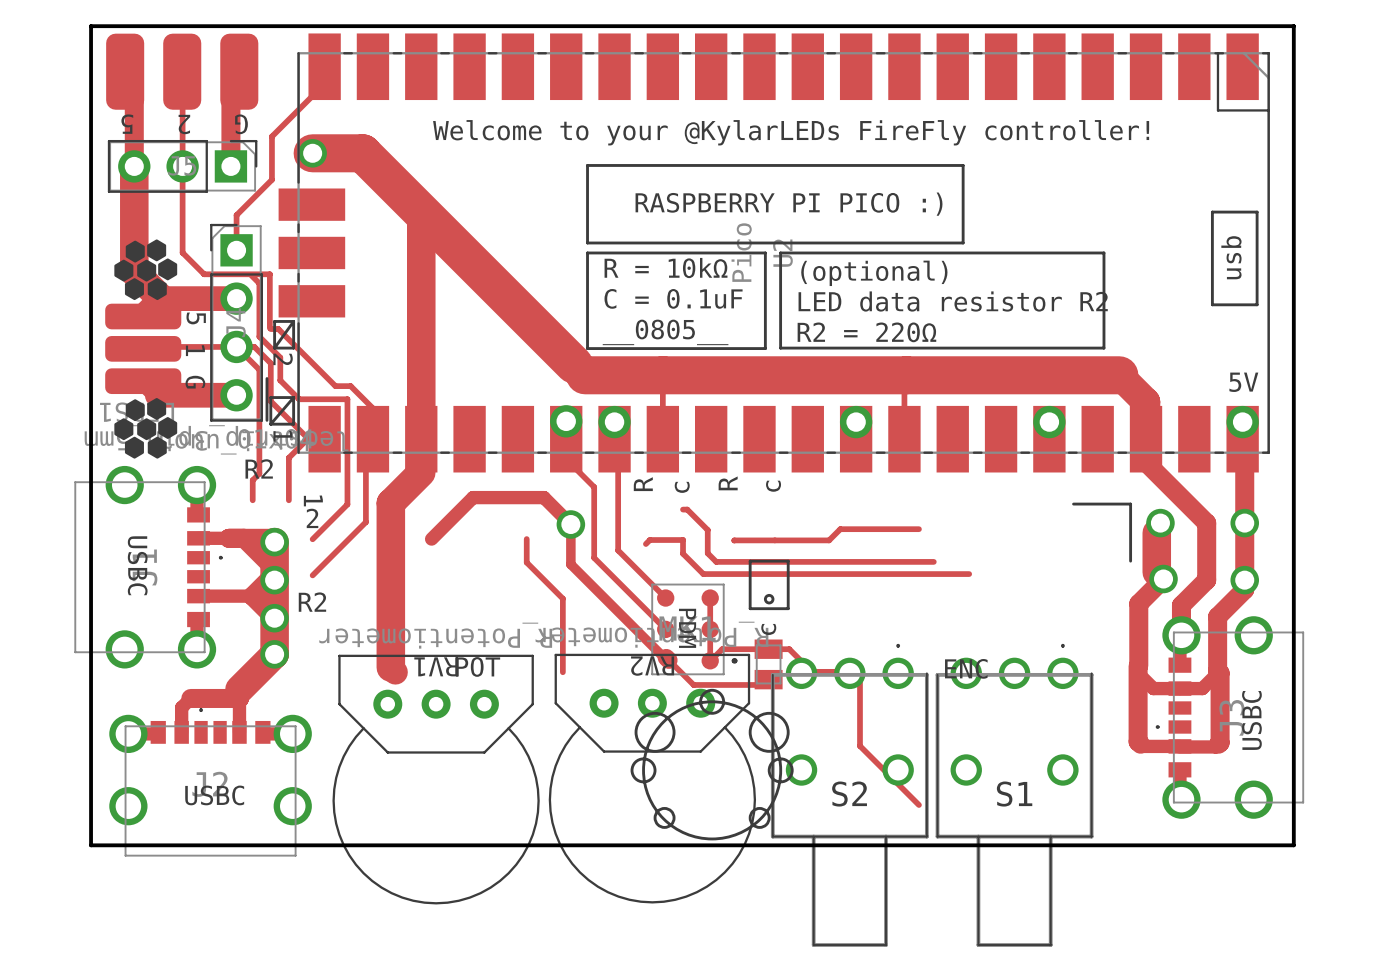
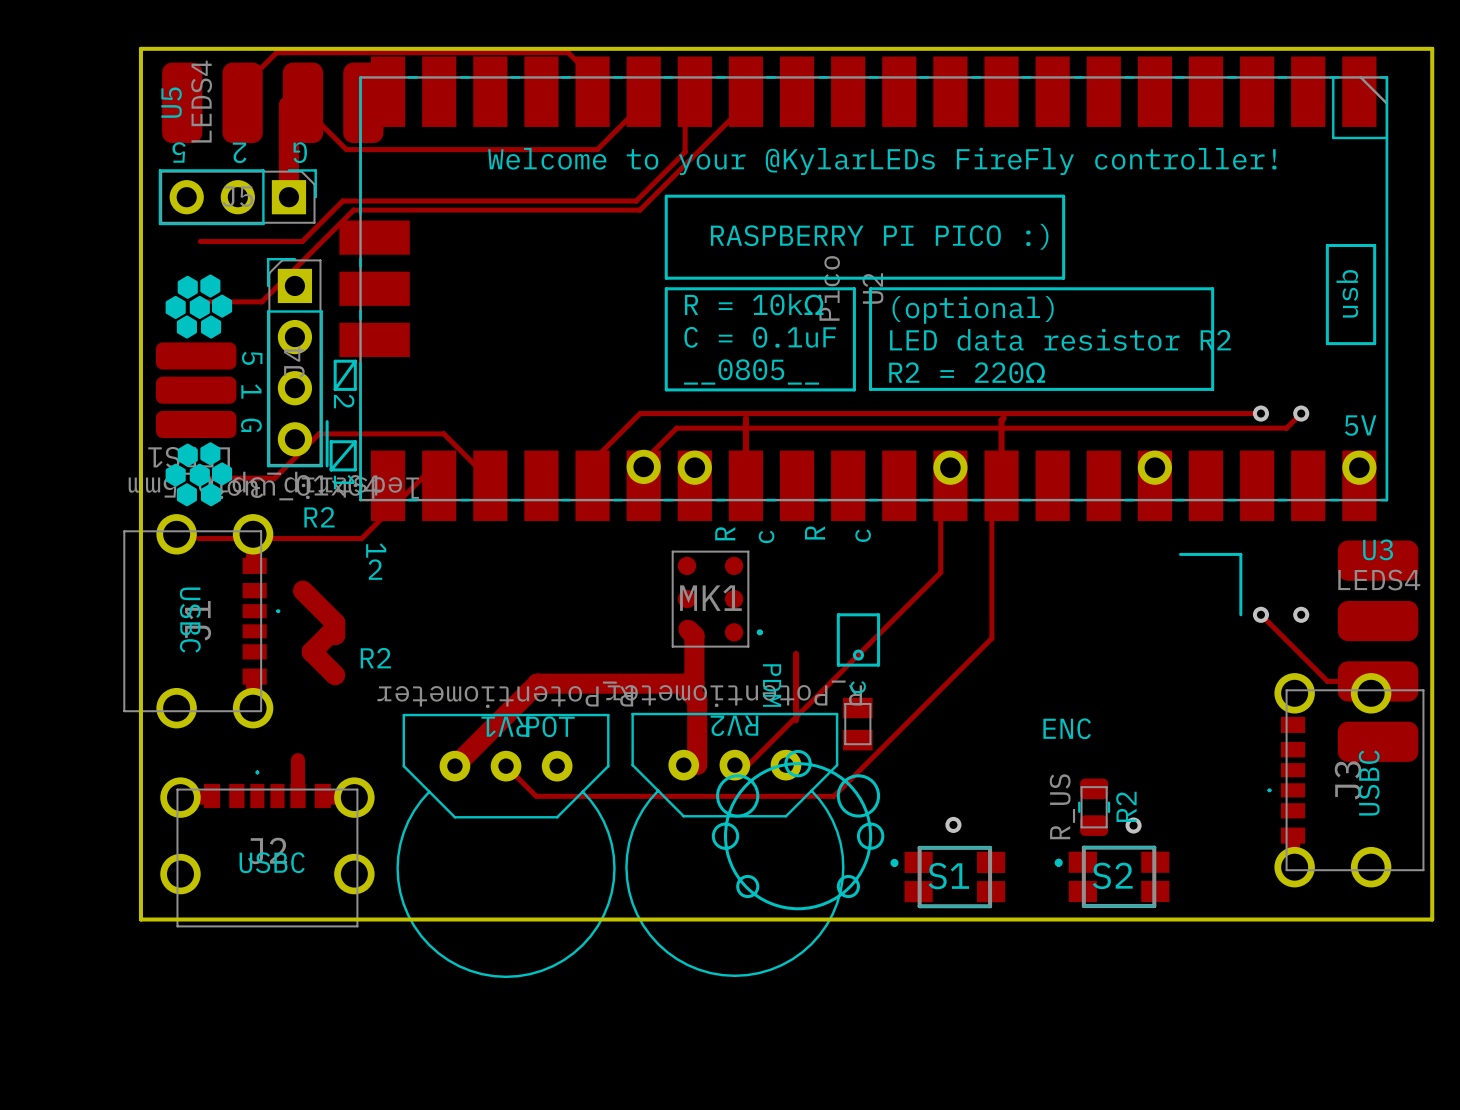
board edge: (1293, 26) (1293, 845) (91, 845) -> (1413, 48) (1432, 48) (1432, 919) (140, 919) (140, 915)
track: (125, 71) (134, 80) (134, 271) (161, 298) -> none
track: (182, 71) (182, 252) (204, 274) (269, 274) (269, 328) -> none
part: (182, 71) -> none
track: none -> (242, 102) (242, 86) (276, 52) (568, 52) (582, 67) (582, 112)
U5: none -> LEDS4 (272, 102)
track: none -> (302, 102) (302, 106) (346, 149) (597, 149) (634, 112)
track: (324, 83) (271, 136) (271, 179) (236, 215) (236, 250) -> none
track: none -> (685, 112) (685, 152) (636, 201) (342, 201) (302, 241) (200, 241)
track: none -> (736, 112) (640, 210) (353, 210) (261, 301) (200, 301)
track: (312, 153) (362, 153) -> none
via: (312, 153) -> none
track: (362, 153) (421, 211) (421, 472) (390, 503) (390, 667) (395, 672) -> none
track: (362, 153) (574, 364) -> none
track: (251, 275) (259, 283) (259, 336) (280, 357) (280, 380) (299, 399) (347, 399) (347, 504) (312, 539) -> none
track: (161, 298) (231, 298) -> none
track: (270, 329) (278, 329) (335, 386) (350, 386) (372, 408) (372, 422) (365, 429) (365, 522) (312, 575) -> none
track: (236, 346) (259, 369) (259, 473) (252, 480) (252, 500) -> none
track: (143, 348) (145, 346) (254, 346) (270, 363) (270, 401) (308, 439) -> none
track: (572, 362) (585, 375) (1119, 375) (1146, 401) (1146, 462) (1206, 523) (1206, 580) (1181, 605) (1179, 665) -> none
track: none -> (1260, 413) (640, 413) (582, 470)
via: none -> (1260, 413)
track: none -> (1301, 413) (1286, 428) (676, 428) (634, 470)
via: none -> (1301, 413)
track: (143, 381) (157, 395) (236, 395) -> none
track: (566, 422) (566, 459) (594, 487) (594, 557) (665, 629) -> none
track: (614, 422) (618, 425) (618, 550) (665, 598) -> none
track: (1242, 422) (1244, 424) (1244, 589) (1217, 616) (1220, 742) (1215, 746) (1179, 746) -> none
track: none -> (429, 470) (361, 538) (198, 538)
track: none -> (480, 470) (443, 433) (319, 433) (274, 478) (198, 478)
track: none -> (940, 470) (940, 572) (748, 764)
track: none -> (991, 470) (991, 638) (833, 796) (536, 796) (506, 766)
track: (324, 438) (307, 438) (288, 457) (288, 500) -> none
track: (683, 509) (687, 509) (707, 530) (707, 553) (716, 561) (933, 561) -> none
track: (1160, 523) (1163, 526) (1156, 532) (1156, 572) (1163, 579) (1138, 603) (1138, 666) -> none
via: (1160, 523) -> none
via: (1244, 523) -> none
via: (570, 524) -> none
track: (918, 529) (840, 529) (829, 540) (734, 540) -> none
track: (198, 538) (270, 538) (274, 542) (274, 654) (239, 689) (239, 698) (190, 698) (181, 707) (181, 732) -> none
track: (431, 539) (473, 497) (543, 497) (570, 524) (570, 564) (693, 684) (763, 684) (768, 679) -> none
track: (526, 539) (526, 562) (562, 598) (562, 672) -> none
via: (274, 542) -> none
track: (645, 544) (649, 540) (683, 540) (683, 553) (703, 574) (969, 574) -> none
track: none -> (1260, 614) (1327, 681) (1378, 681)
via: none -> (1260, 614)
via: none -> (1301, 614)
track: none -> (688, 630) (694, 635) (694, 683) (537, 683) (454, 766)
via: (1163, 579) -> none
via: (274, 580) -> none
via: (1244, 580) -> none
U3: none -> LEDS4 (1378, 651)
track: (198, 596) (252, 596) -> none
via: (274, 618) -> none
MK1 position: (694, 629) -> (717, 599)
track: none -> (687, 690) (697, 699) (697, 764)
S2 footprint: [770, 643, 929, 947] -> [1054, 845, 1170, 909]
S1 footprint: [935, 643, 1094, 947] -> [890, 845, 1006, 909]
via: (274, 654) -> none
track: (707, 663) (722, 649) (789, 649) (811, 671) (859, 671) (859, 746) (918, 805) -> none
track: (1138, 666) (1138, 673) (1153, 688) (1202, 688) (1217, 673) -> none
track: (1138, 666) (1138, 741) (1142, 746) (1179, 746) -> none
R2: none -> R_US (1094, 807)
via: none -> (953, 824)
via: none -> (1133, 825)

